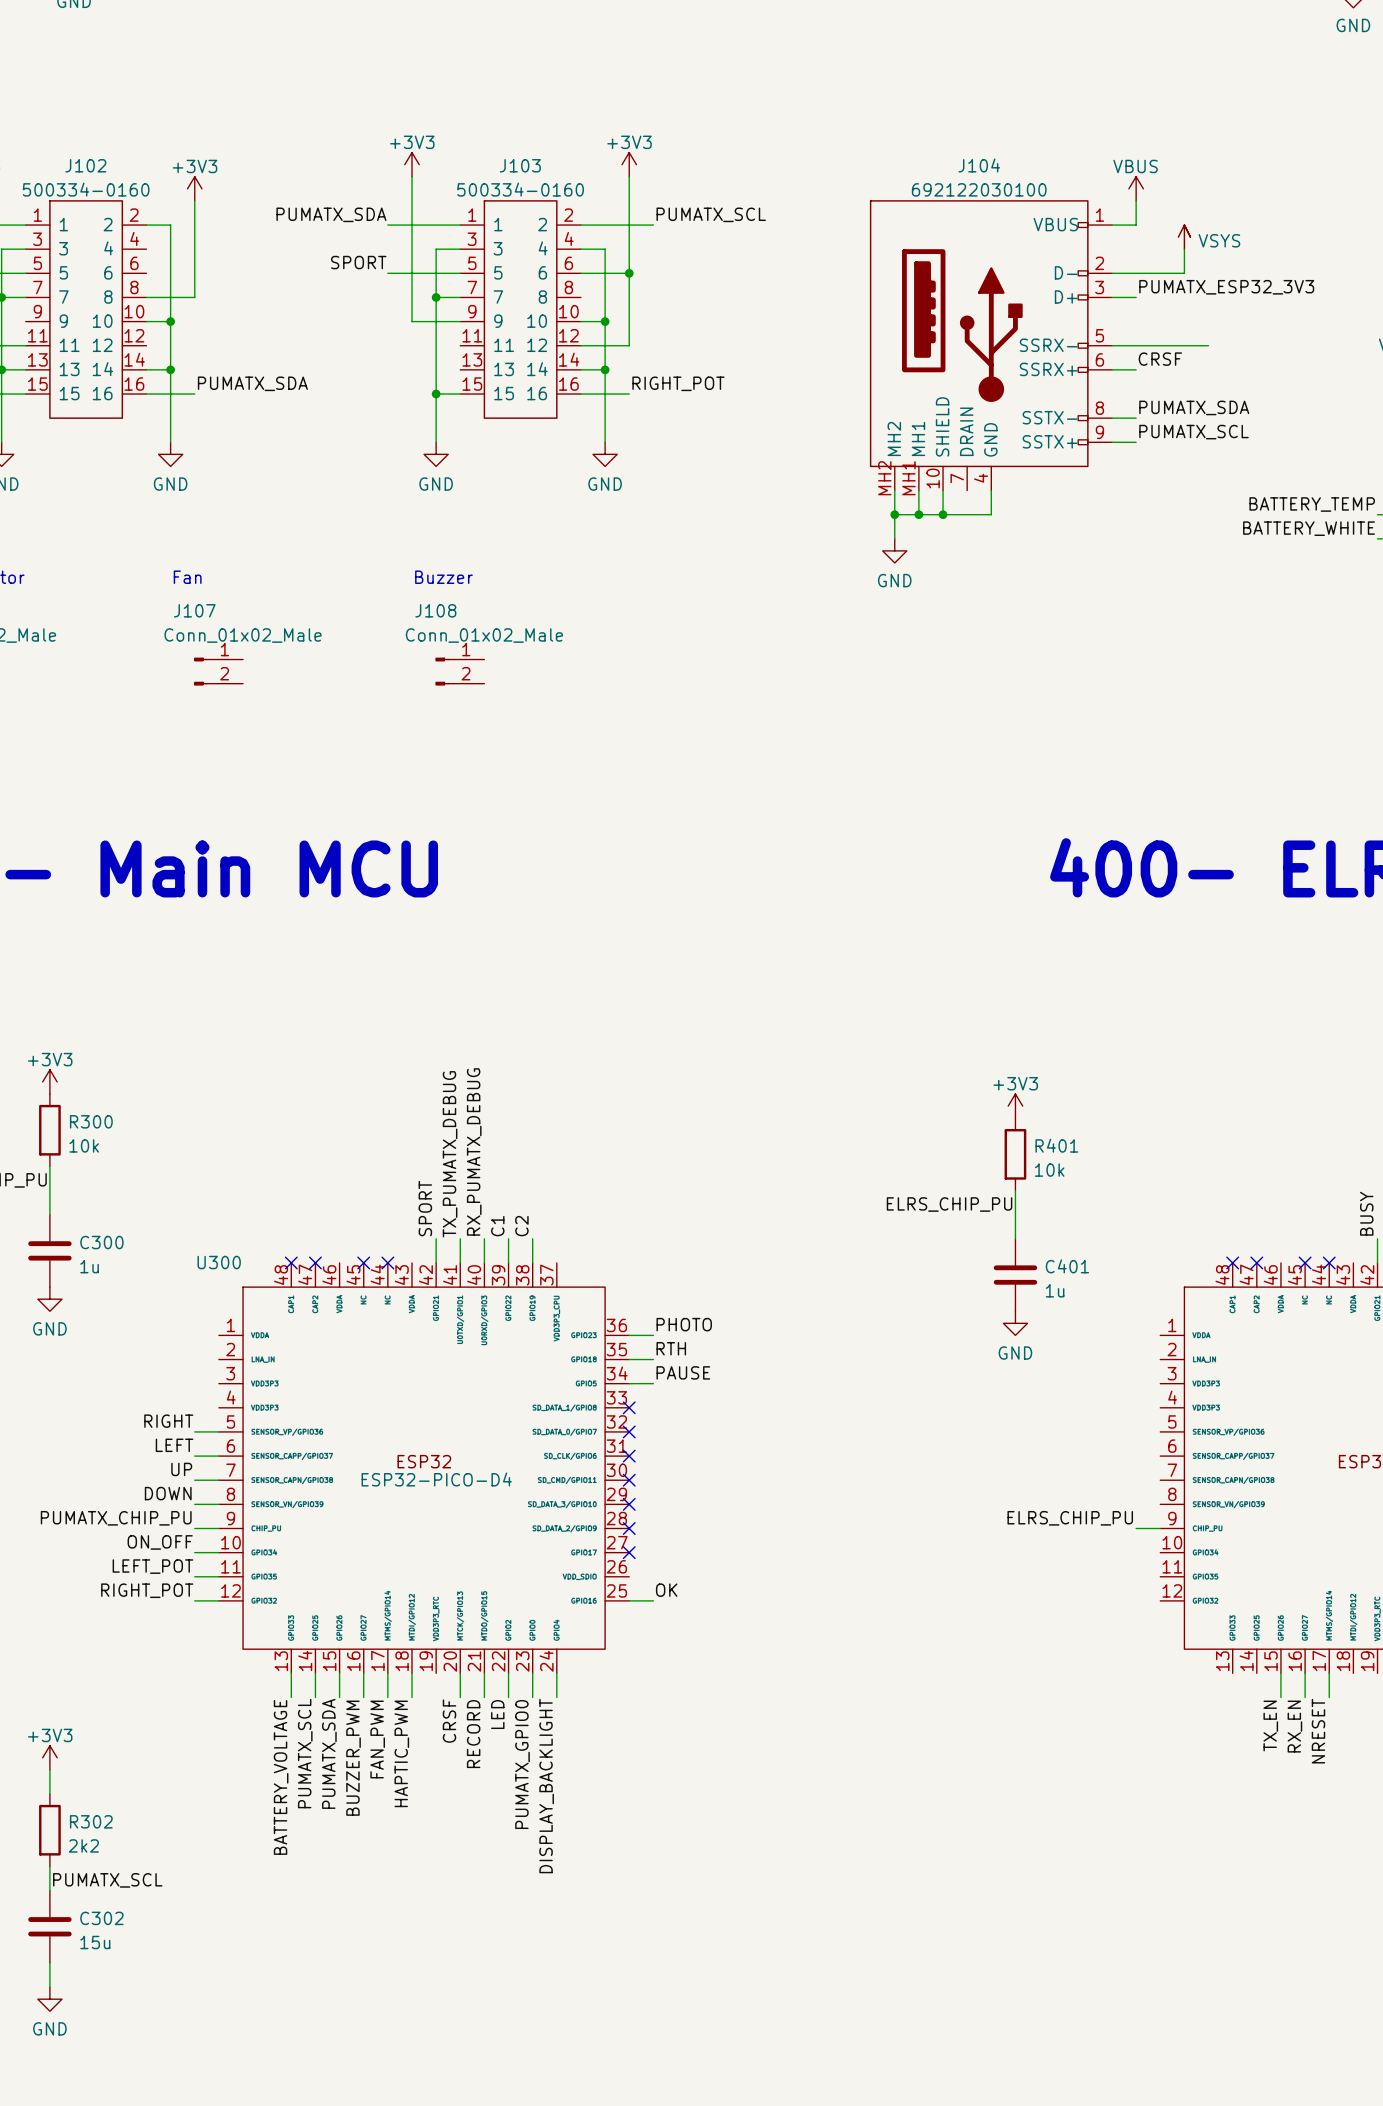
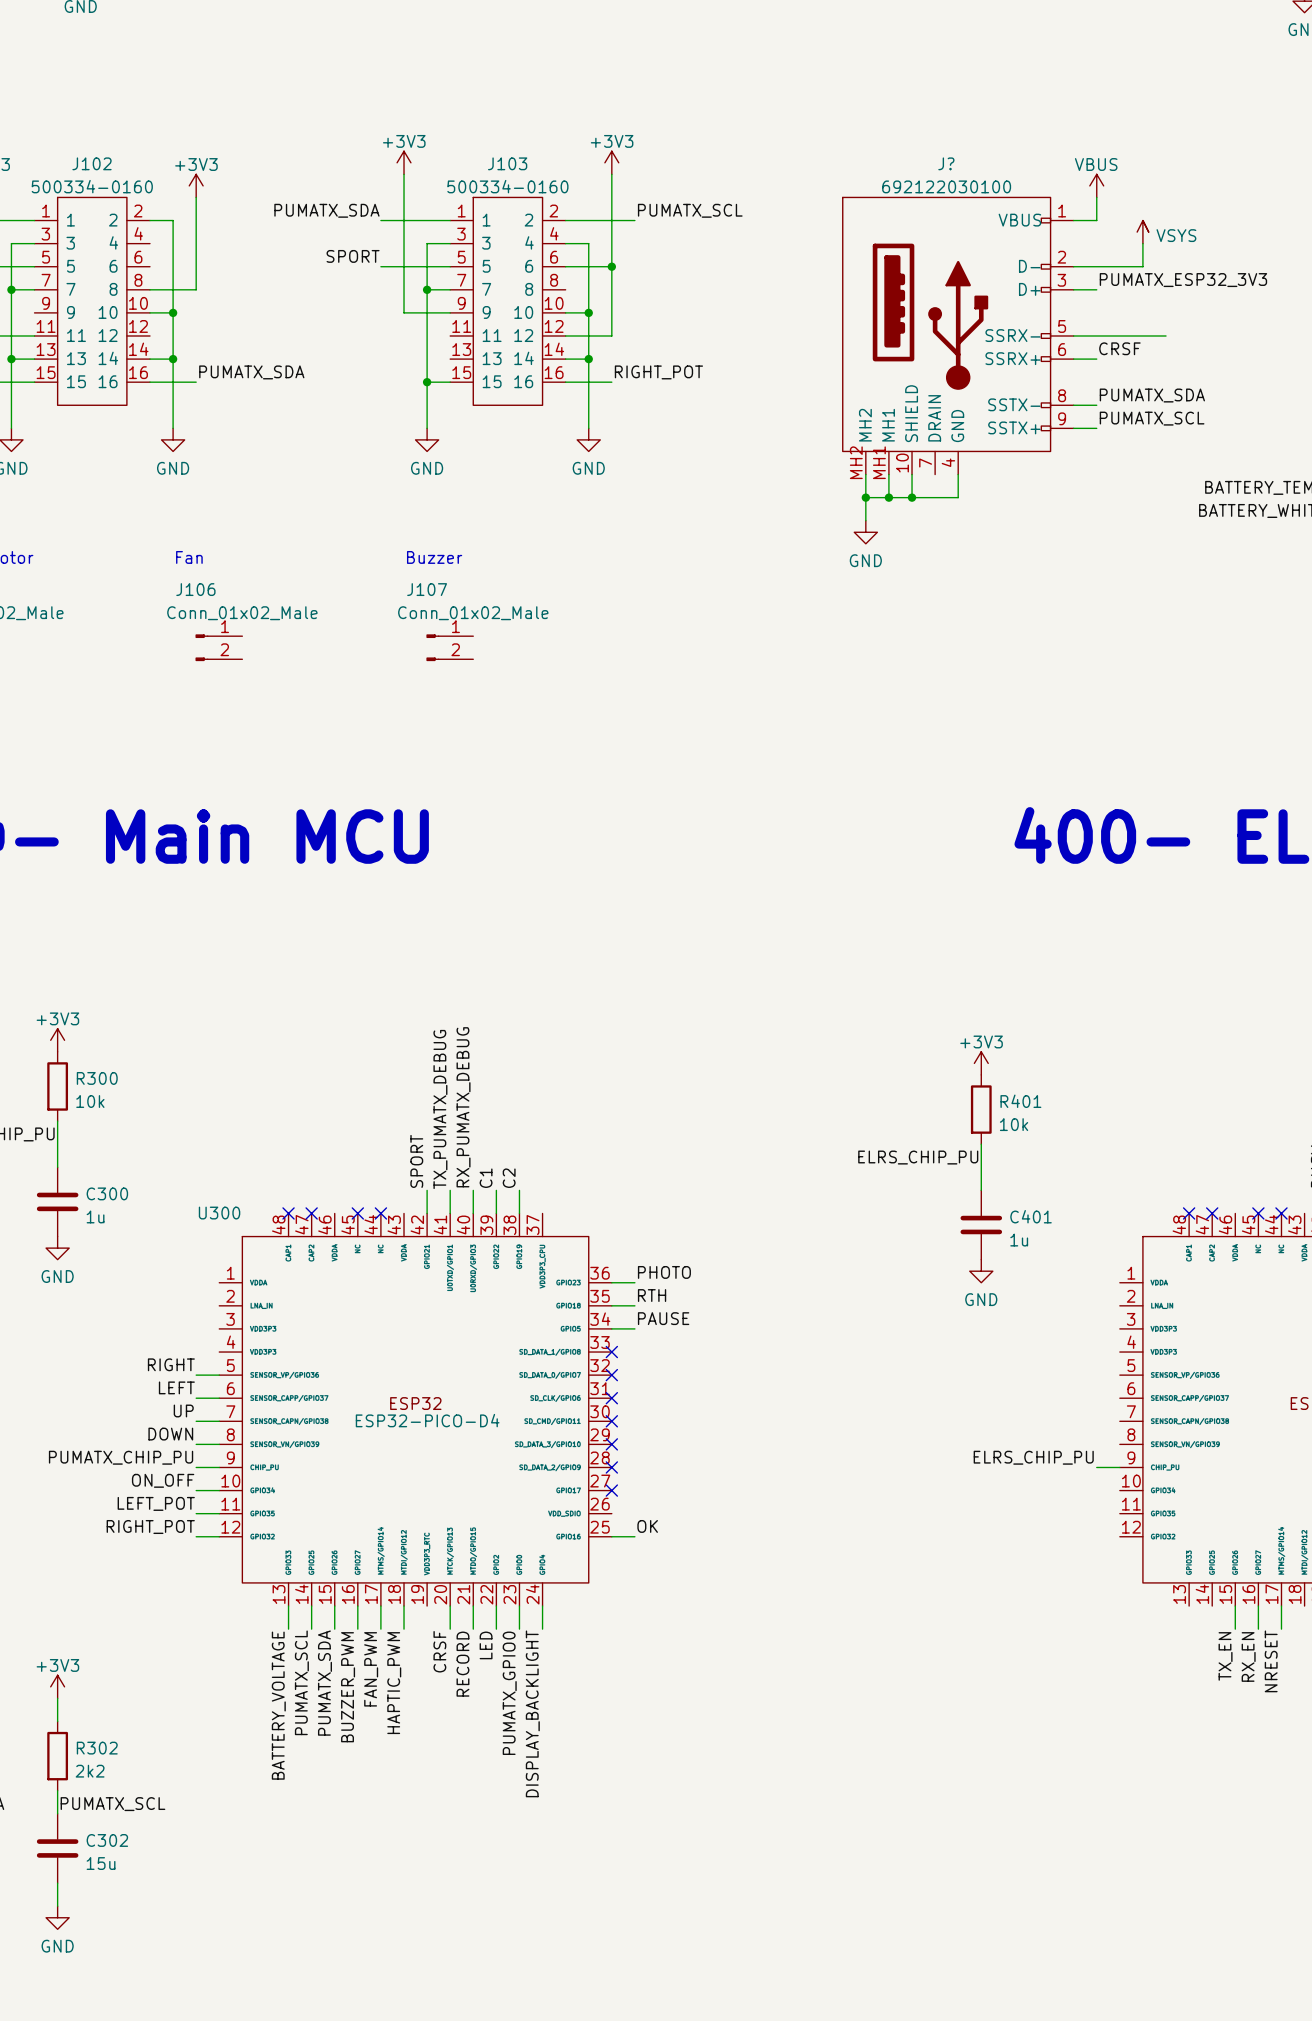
J104 name: J104 (979, 165) -> J? (946, 163)
J107 name: J107 (194, 610) -> J106 (195, 589)
J108 name: J108 (435, 610) -> J107 (427, 589)

